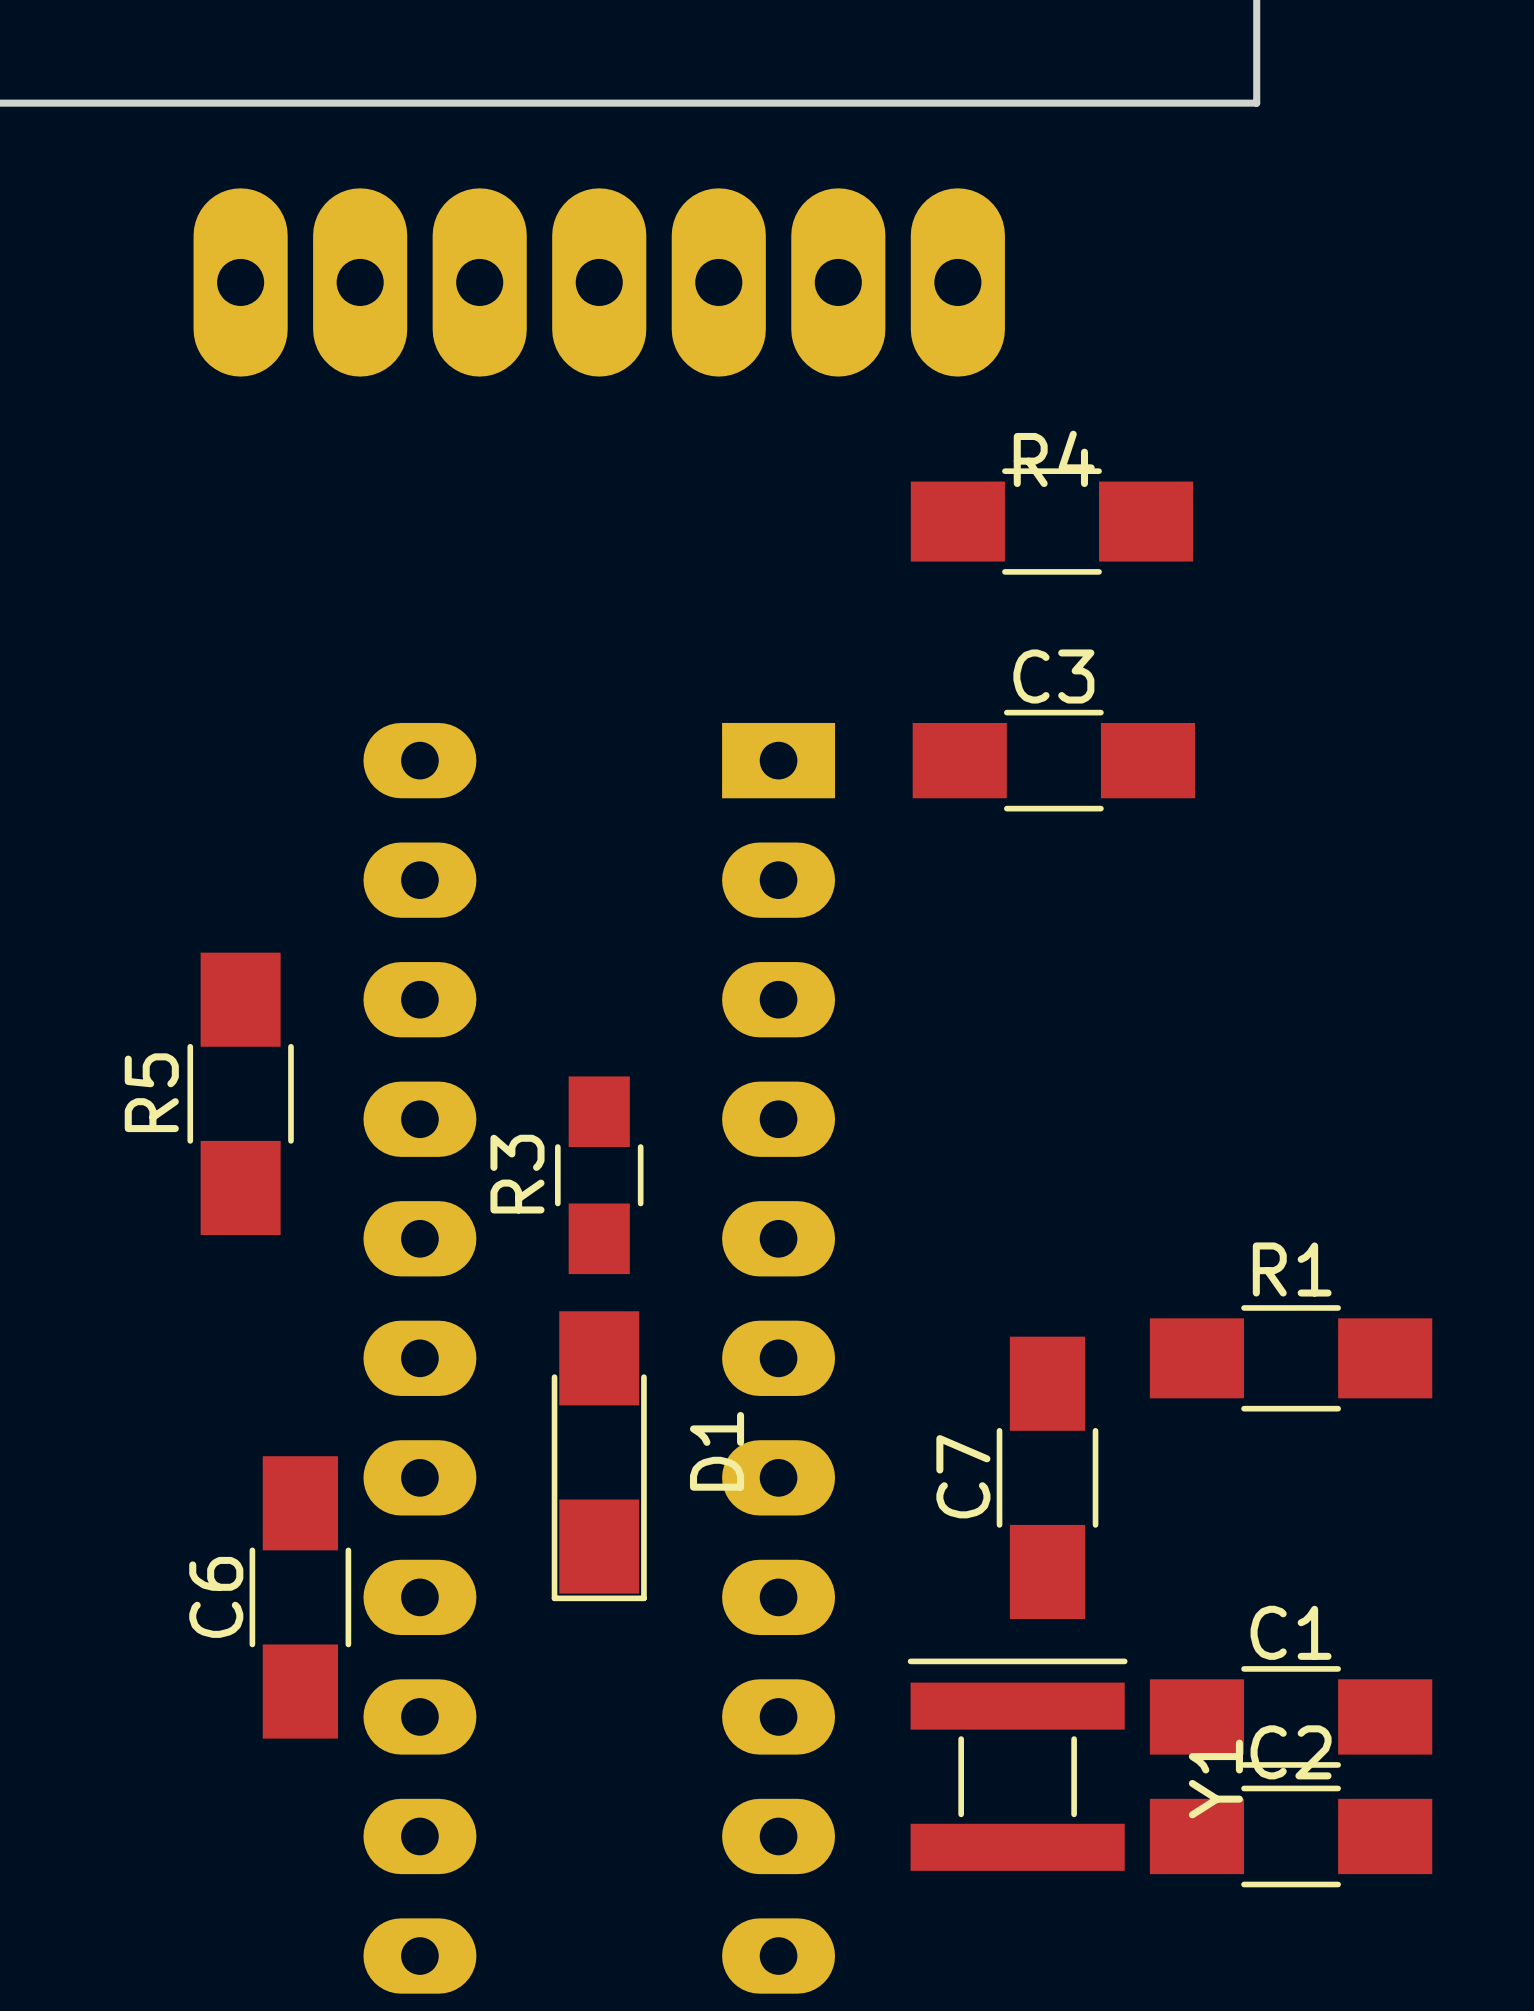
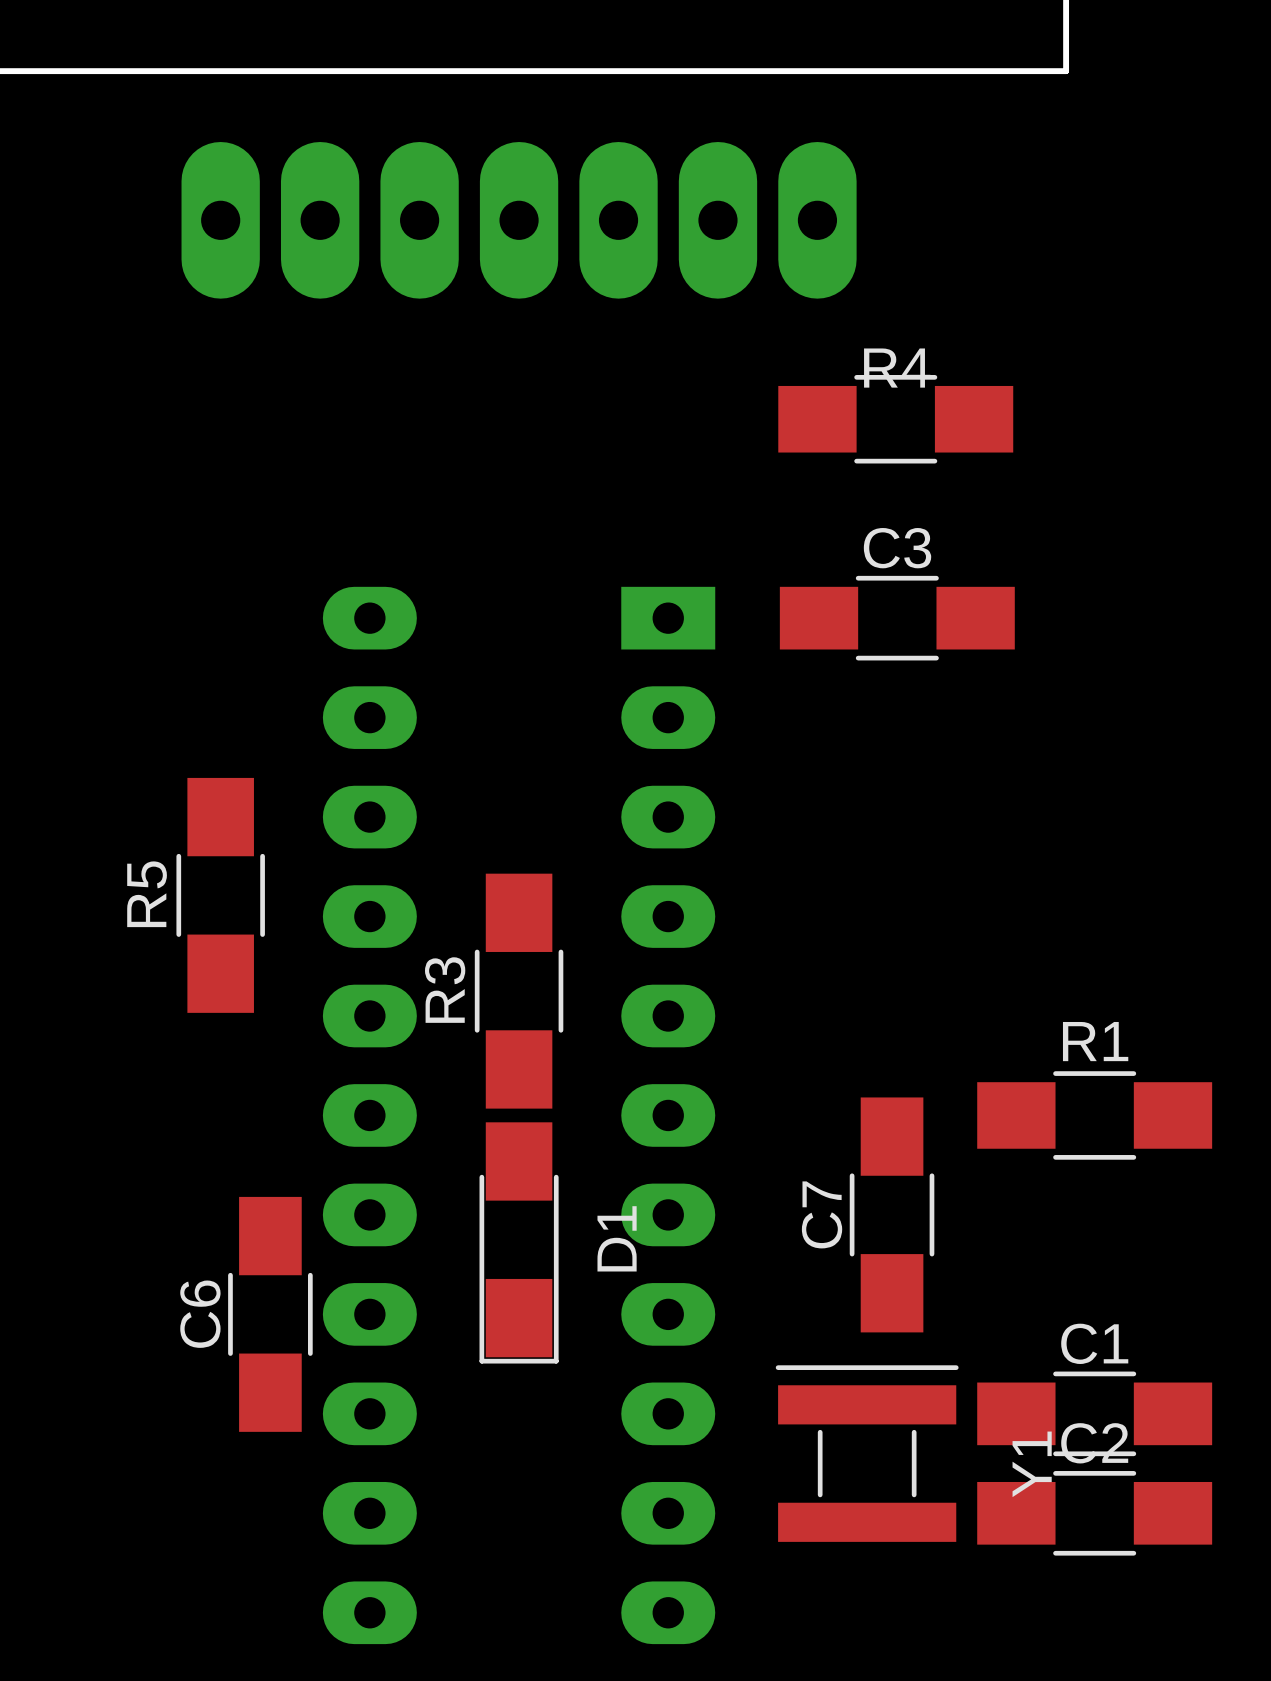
R3 footprint: [555, 1076, 644, 1275] -> [474, 873, 564, 1109]
D1 position: (599, 1456) -> (519, 1242)

